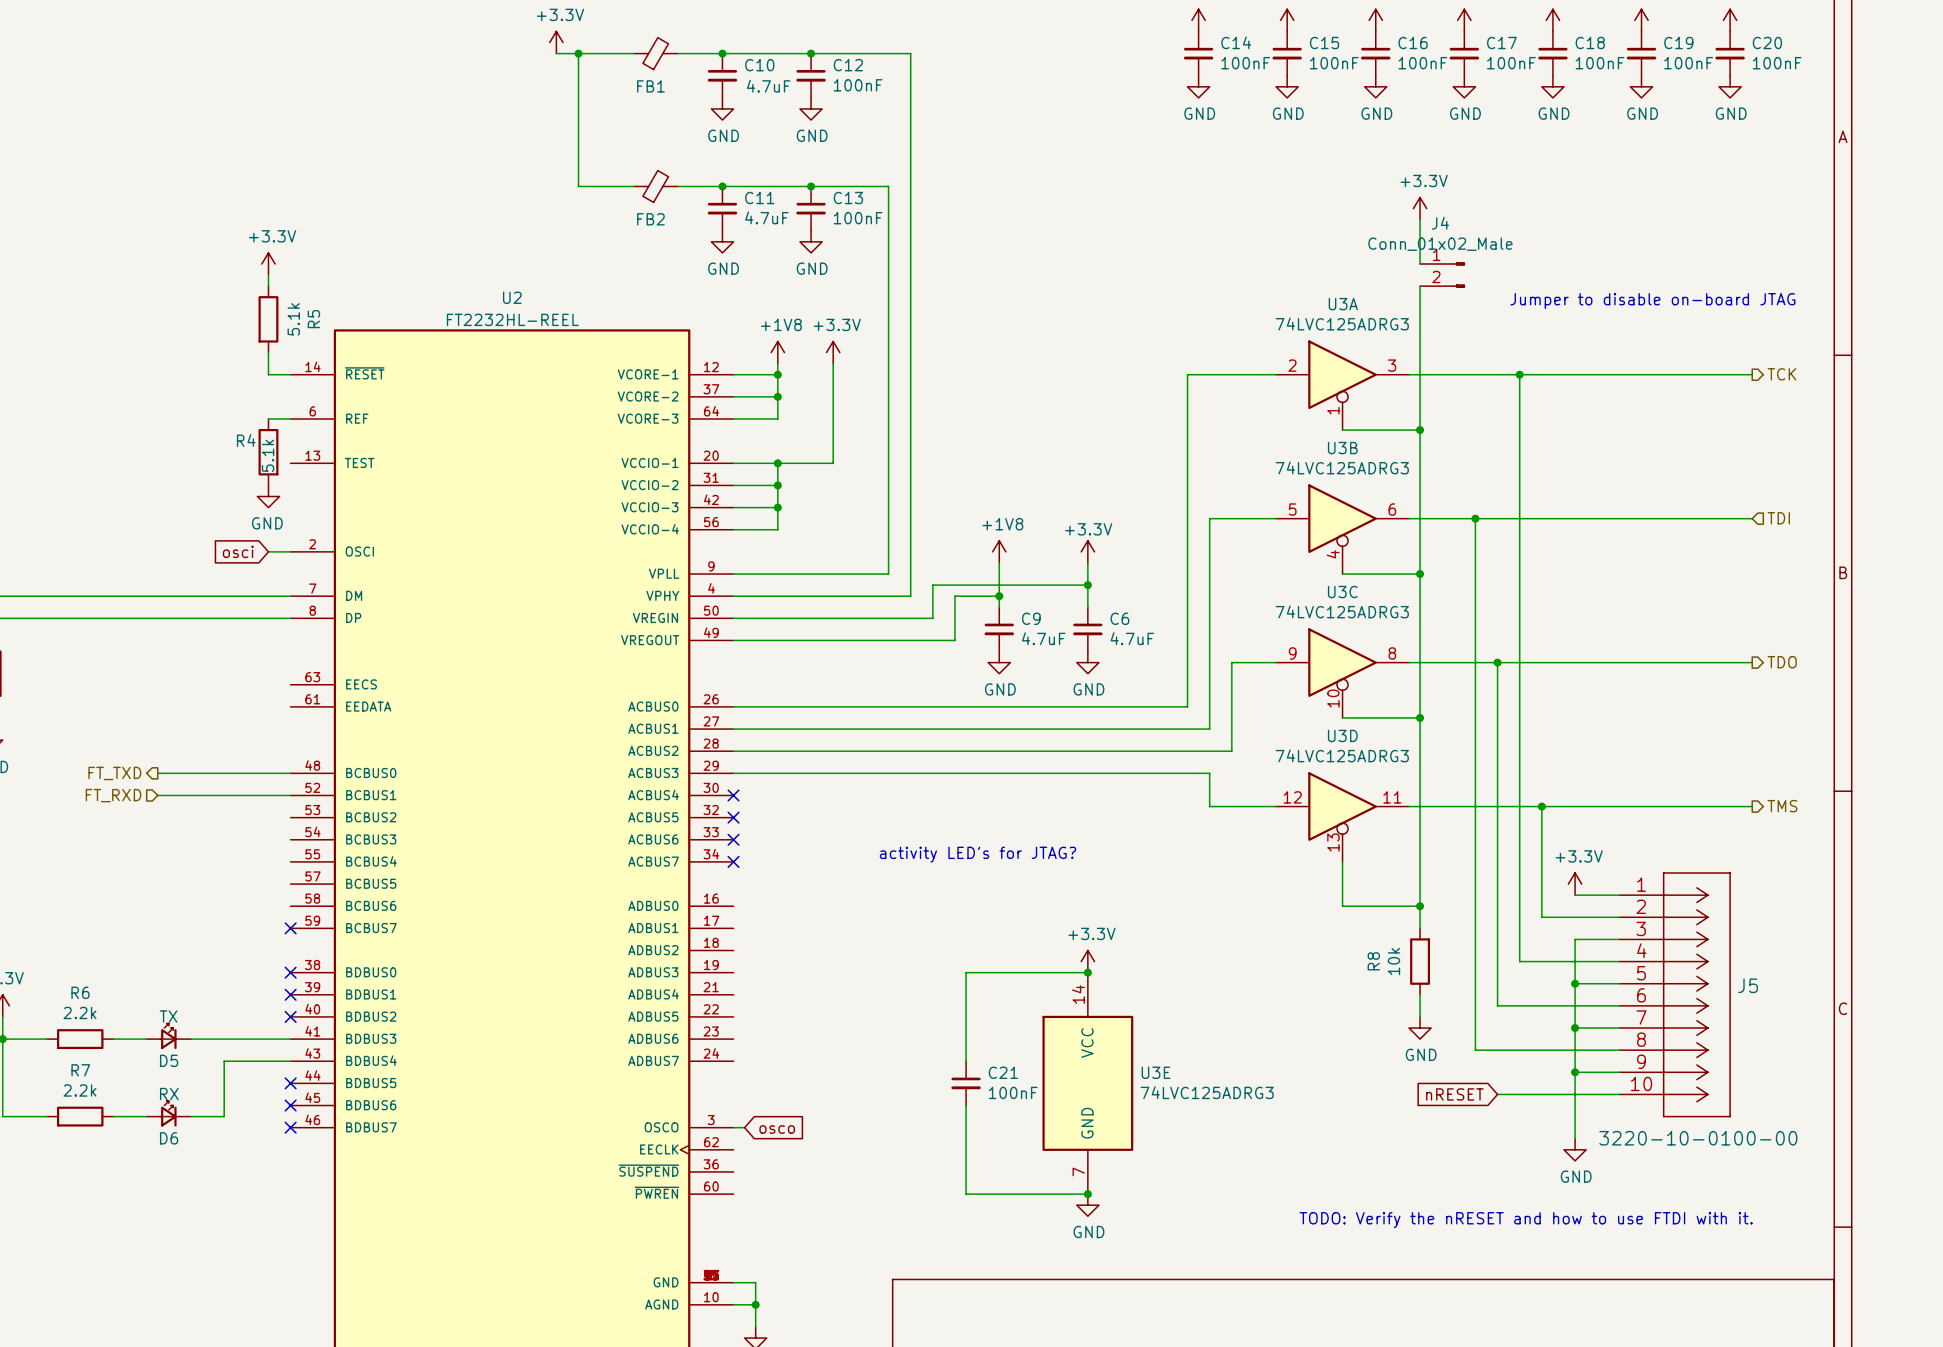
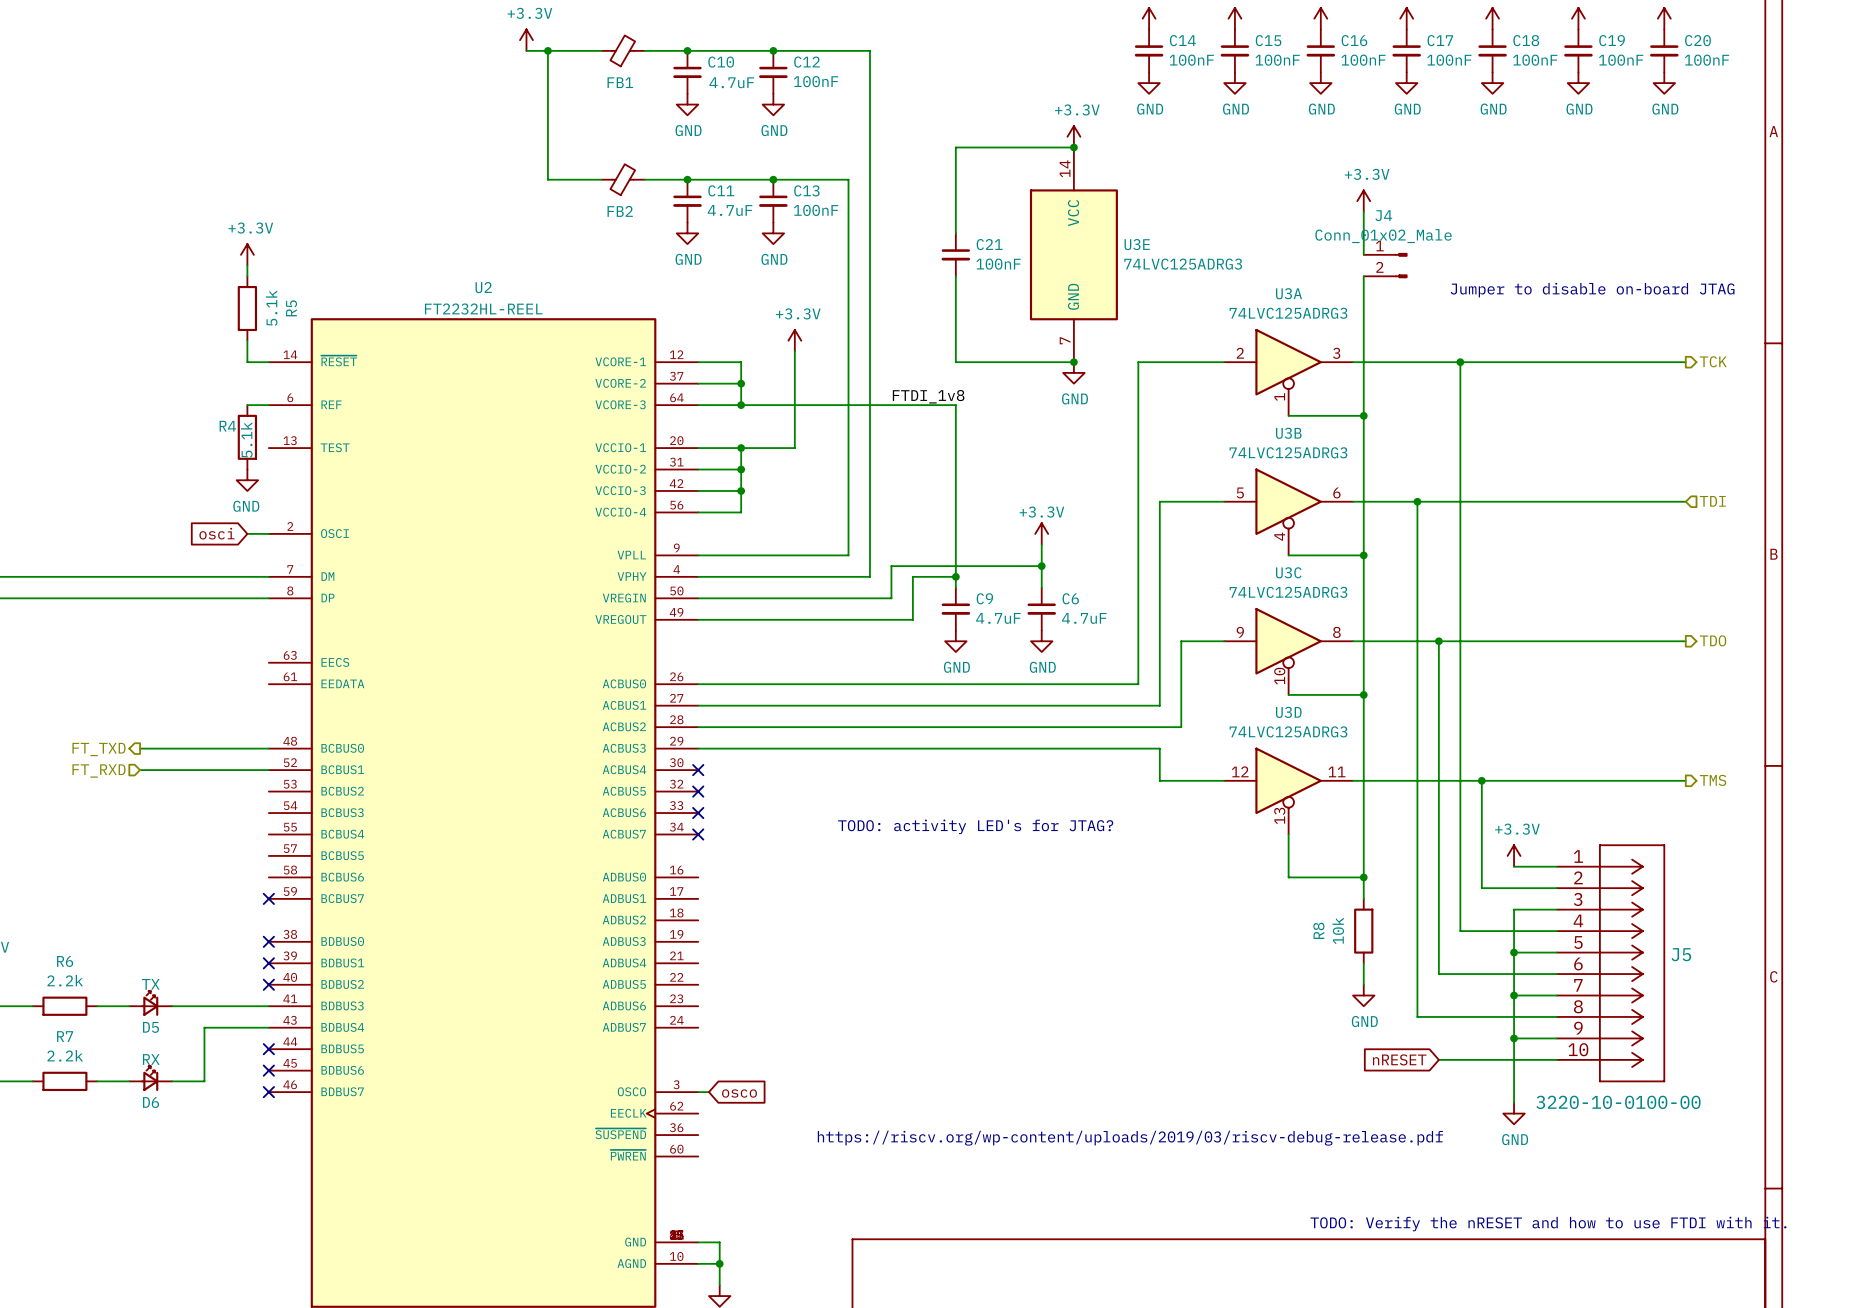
power symbol: none -> +3.3V (1073, 136)
wire: none -> (1073, 147) (955, 147) (955, 233)
junction: none -> (1073, 147)
wire: none -> (955, 276) (955, 362) (1073, 362)
power symbol: +1V8 (777, 352) -> none
wire: (777, 363) (777, 374) -> none
junction position: (777, 374) -> (741, 405)
junction: none -> (1073, 362)
power symbol: none -> GND (1073, 372)
label: none -> FTDI_1v8 (928, 396)
wire: none -> (741, 405) (955, 405) (955, 544)
power symbol: +1V8 (999, 551) -> none
text: activity LED's for JTAG? (978, 854) -> TODO: activity LED's for JTAG? (975, 826)
power symbol: +3.3V (1087, 961) -> none
wire: (1087, 972) (966, 972) (966, 1061) -> none
junction: (1087, 972) -> none
C21 position: (966, 1083) -> (955, 254)
U3E position: (1087, 1083) -> (1073, 254)
wire: (966, 1105) (966, 1194) (1087, 1194) -> none
text: none -> https://riscv.org/wp-content/uploads/2019/03/riscv-debug-release.pdf (1130, 1138)
junction: (1087, 1194) -> none
power symbol: GND (1087, 1205) -> none
text position: TODO: Verify the nRESET and how to use FTDI with it. (1526, 1220) -> TODO: Verify the nRESET and how to use FTDI with it. (1548, 1224)

